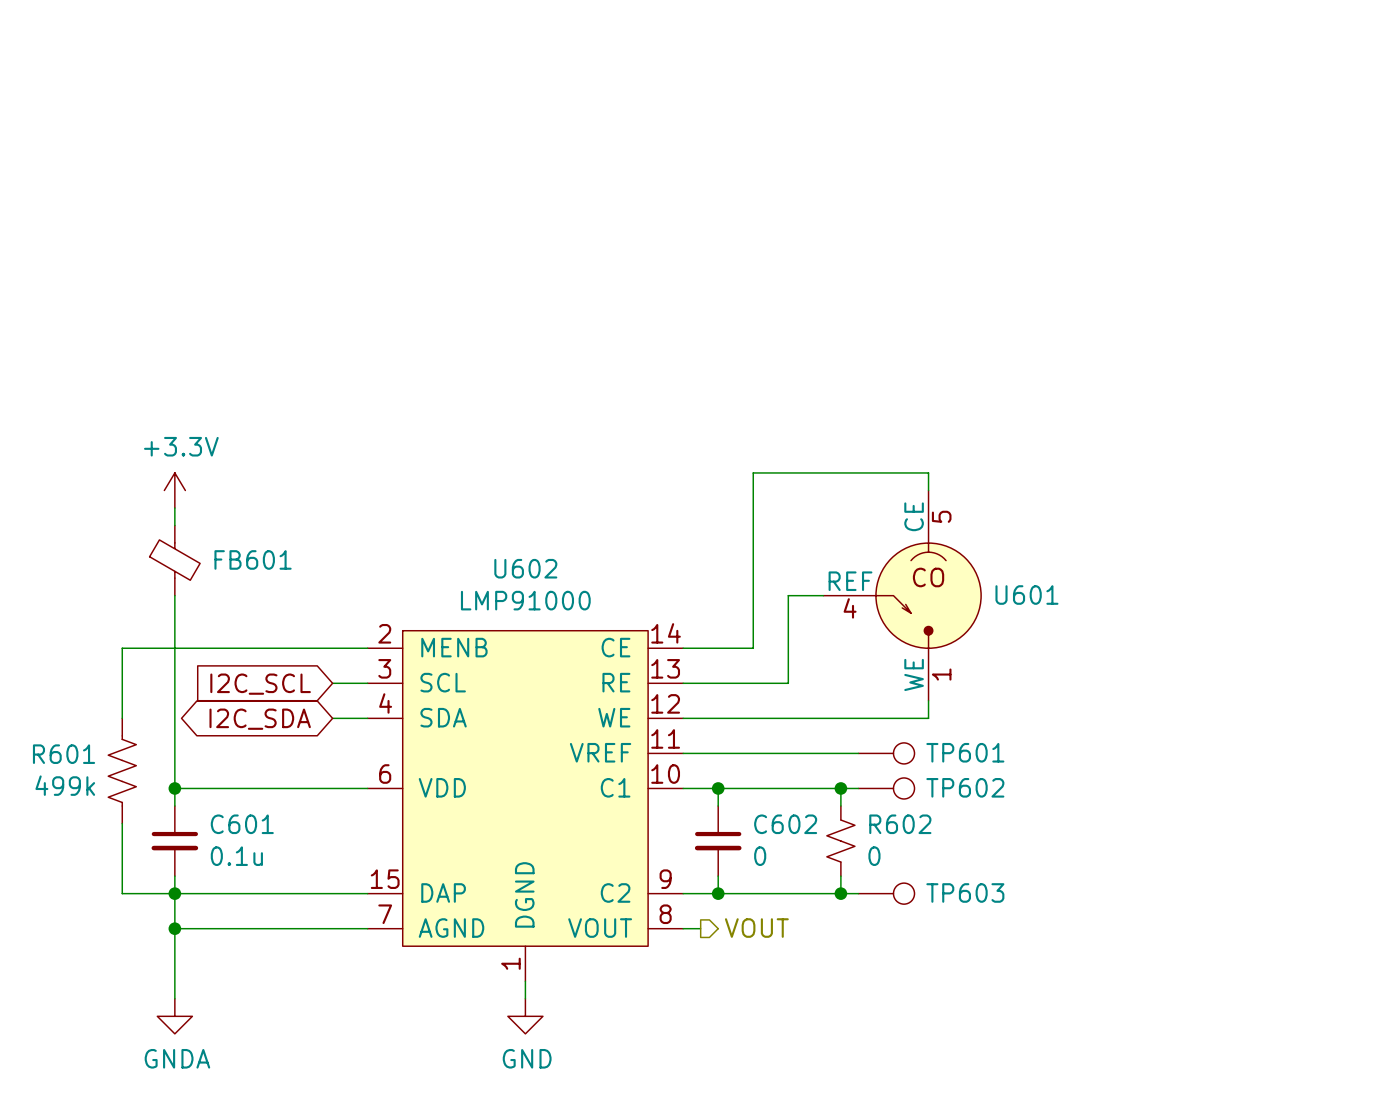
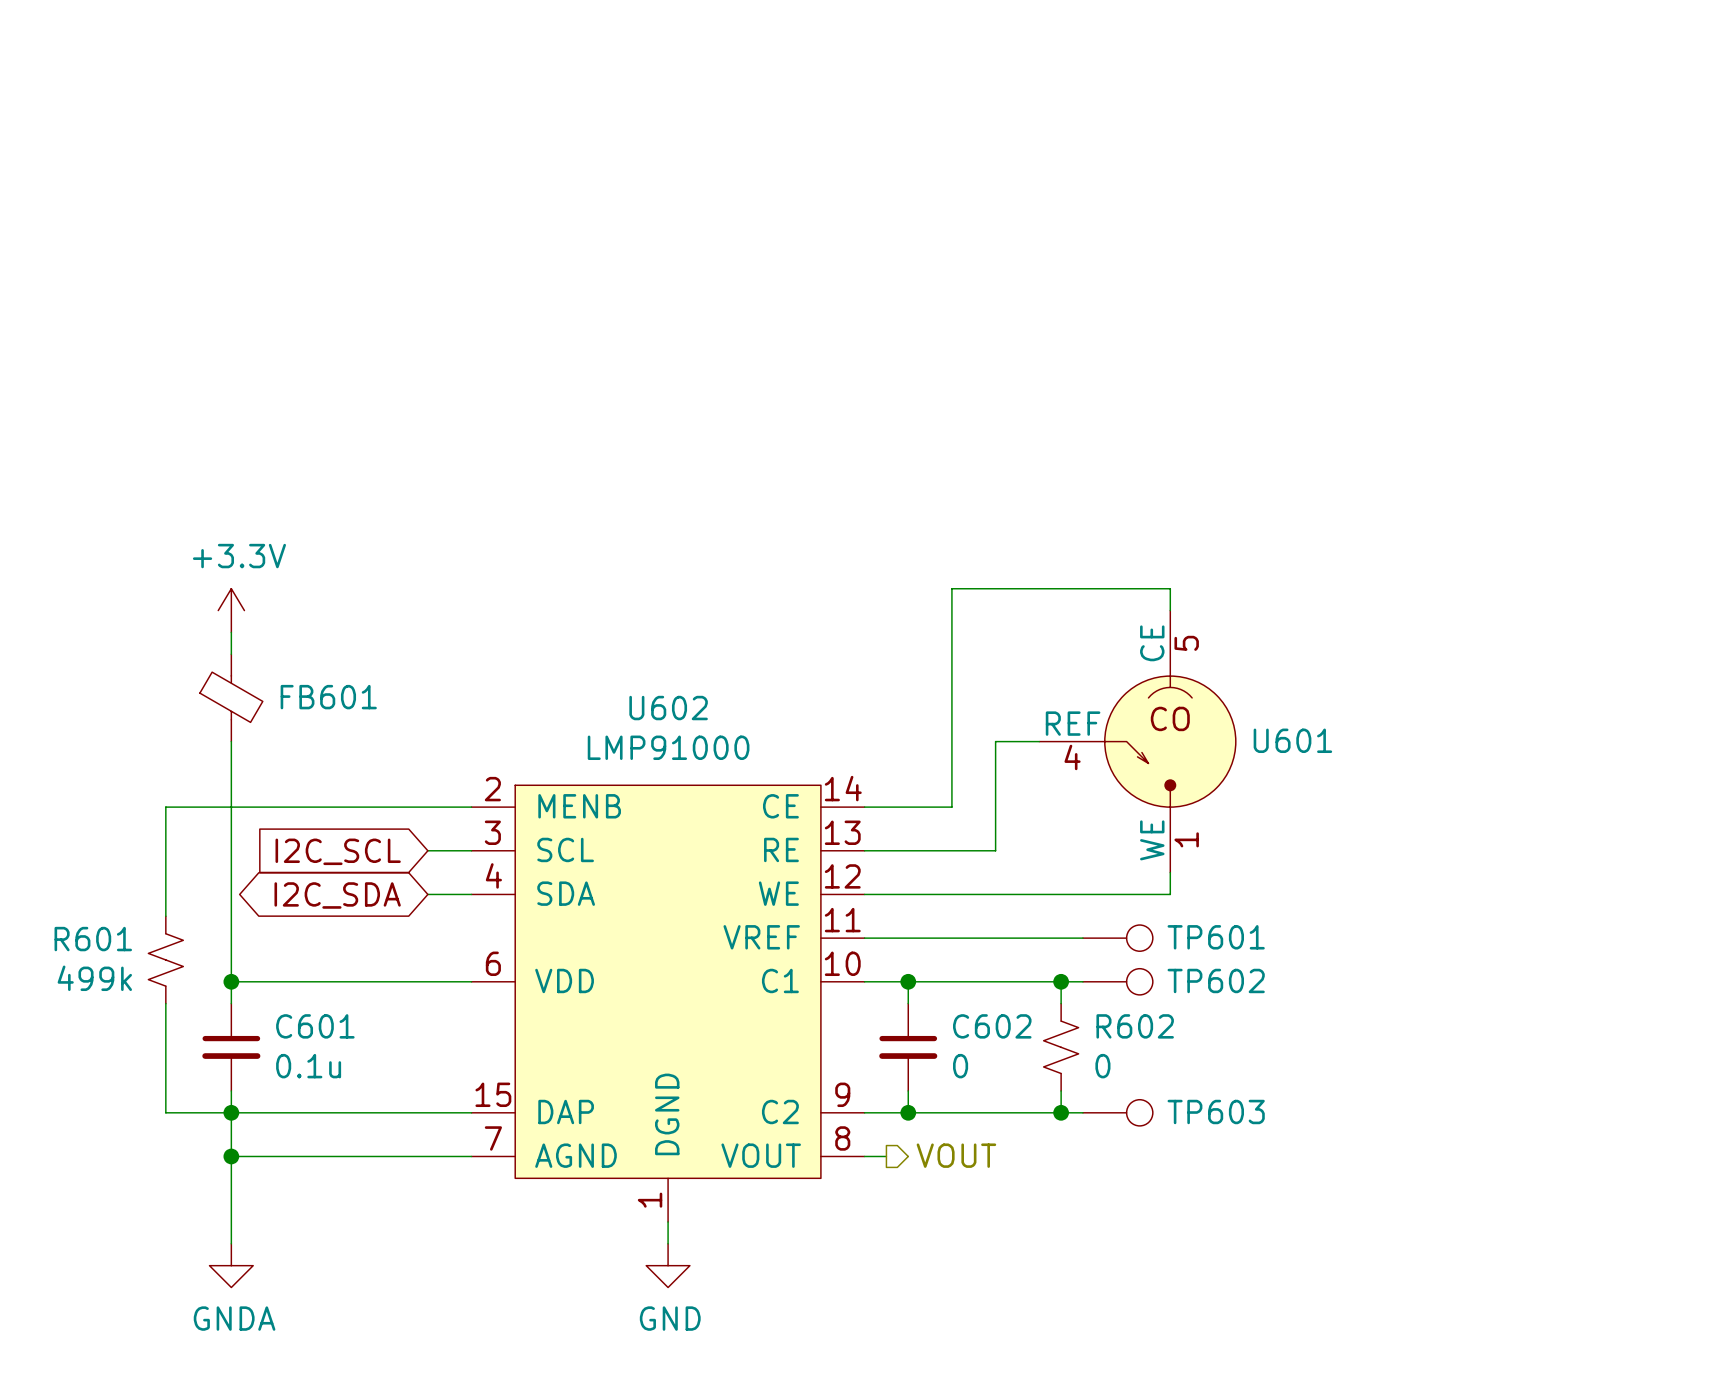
R601 symbol: [108, 718, 137, 824] -> [148, 916, 184, 1004]

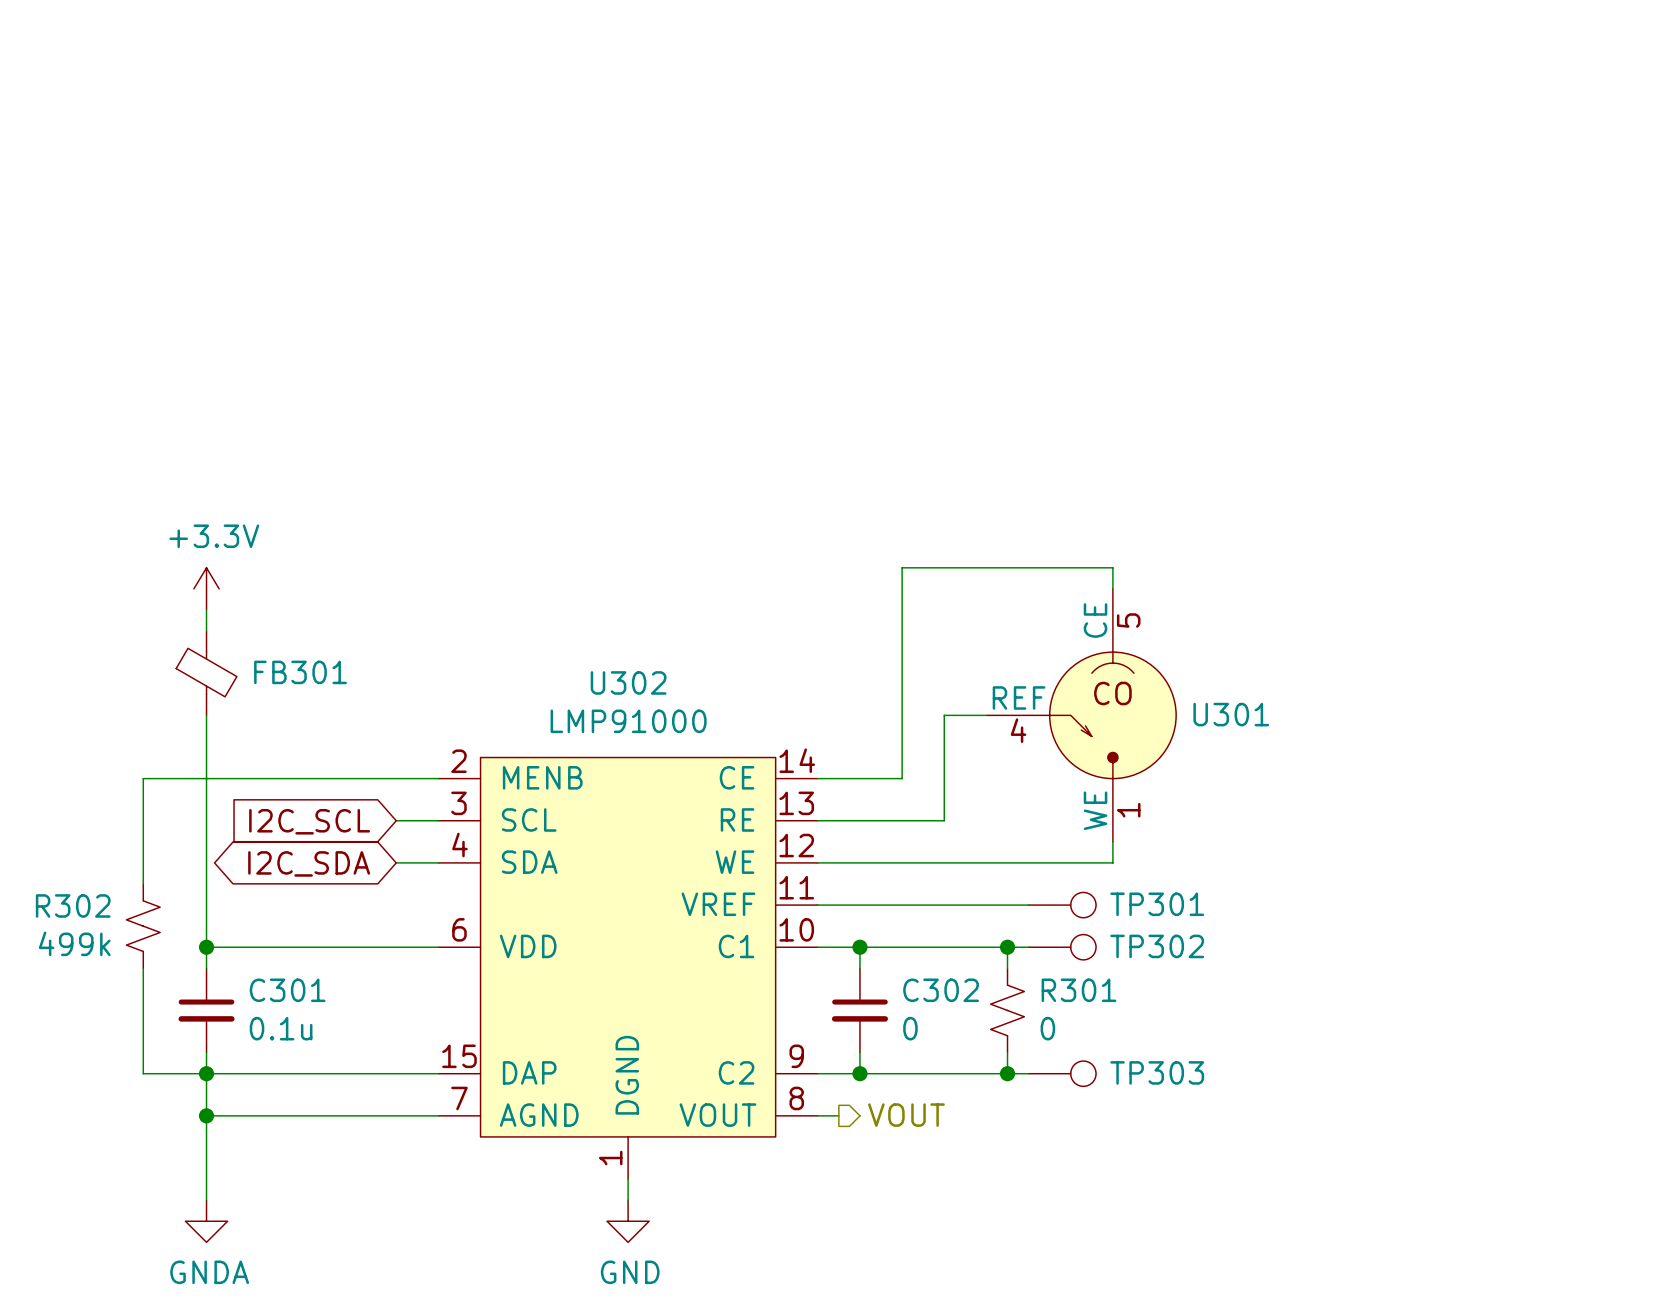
FB601 name: FB601 (328, 697) -> FB301 (300, 672)
U602 name: U602 (668, 708) -> U302 (628, 682)
U601 name: U601 (1292, 740) -> U301 (1231, 714)
TP601 name: TP601 (1216, 937) -> TP301 (1157, 904)
R601 name: R601 (93, 939) -> R302 (73, 905)
TP602 name: TP602 (1216, 980) -> TP302 (1157, 946)
C601 name: C601 (315, 1026) -> C301 (287, 990)
C602 name: C602 (992, 1026) -> C302 (941, 990)
R602 name: R602 (1135, 1026) -> R301 (1079, 990)
TP603 name: TP603 (1216, 1111) -> TP303 (1157, 1072)

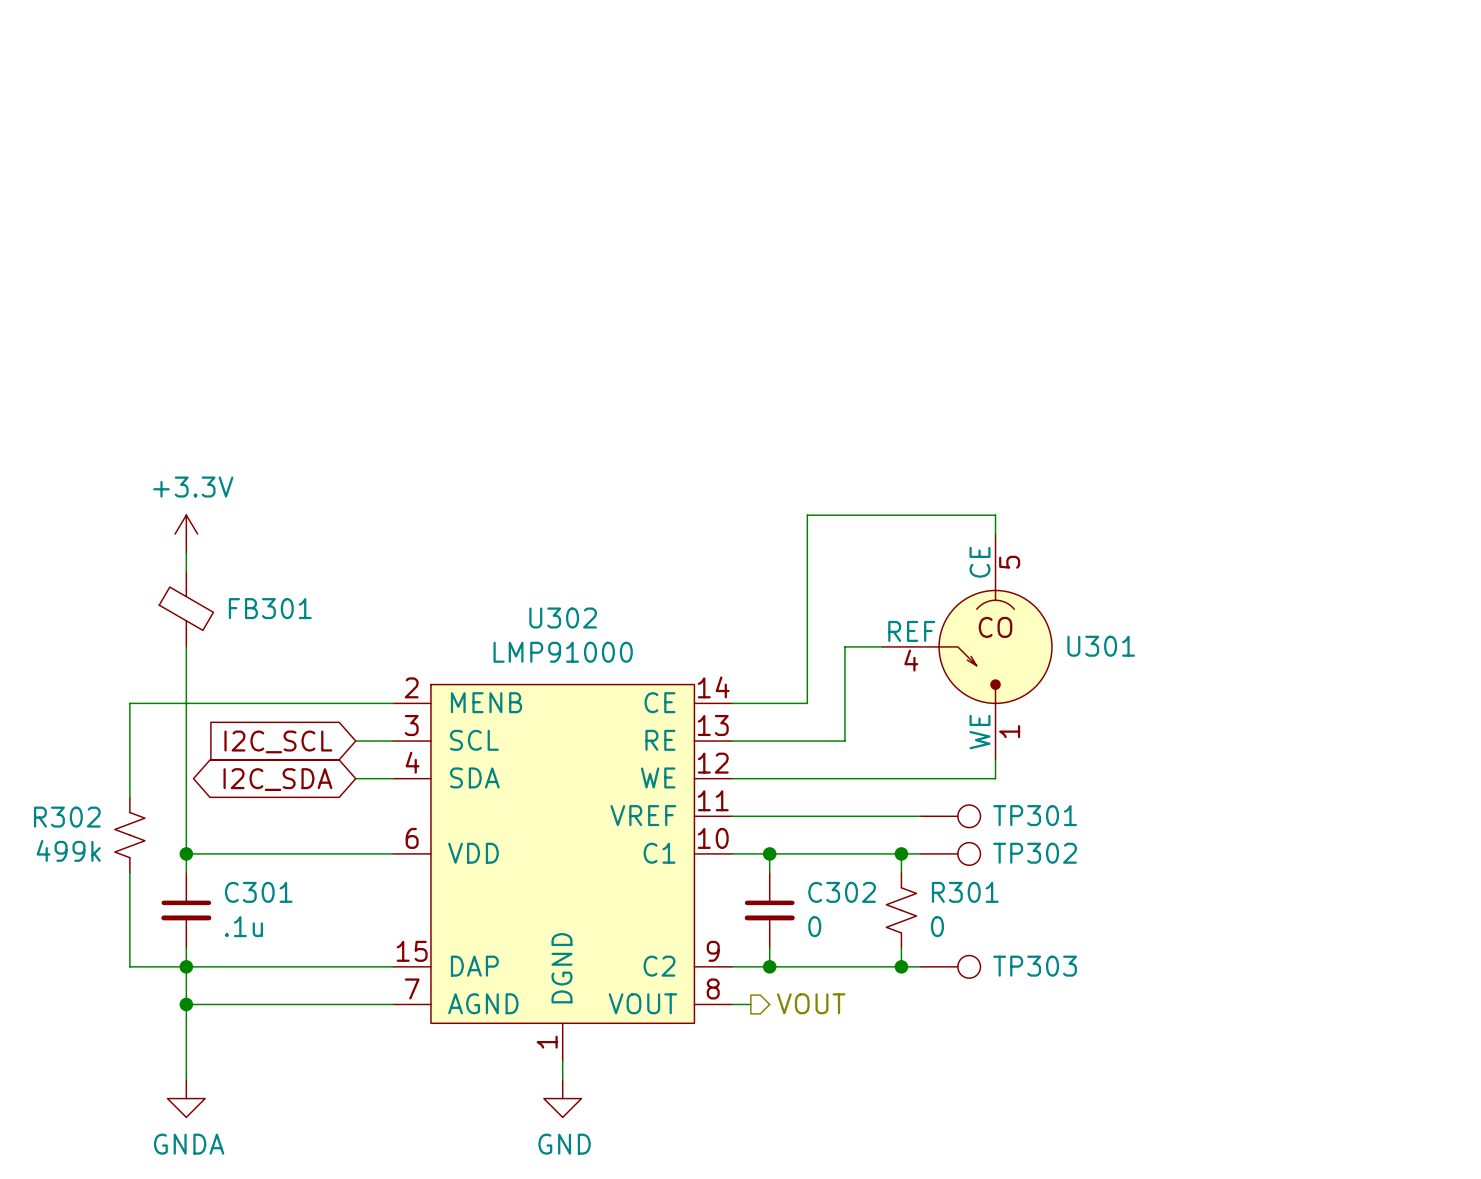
C301 value: 0.1u (281, 1028) -> .1u (243, 926)

